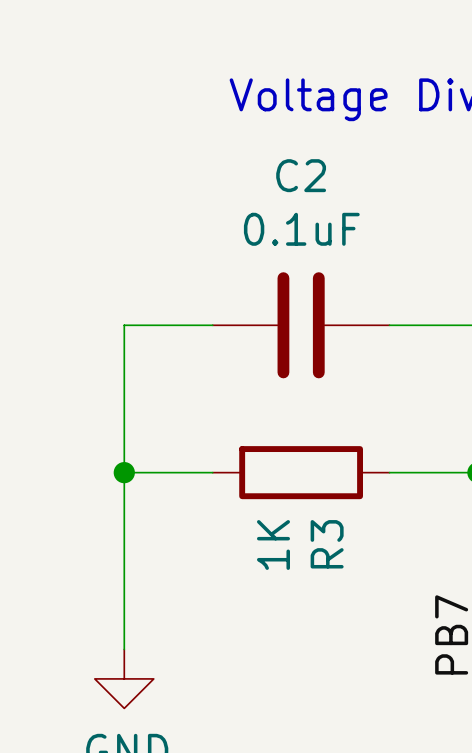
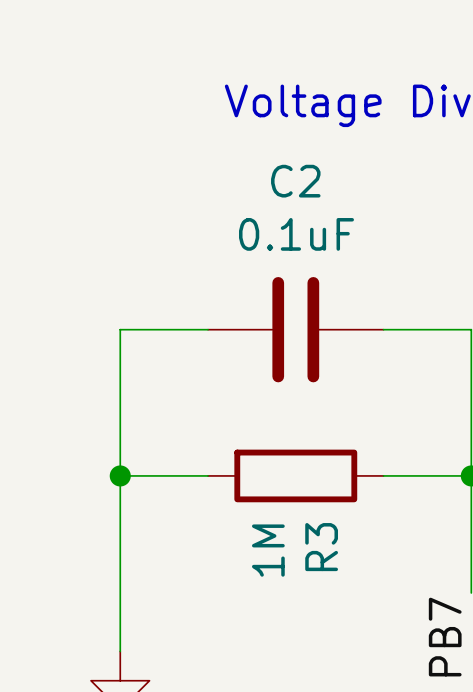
R3 value: 1K (273, 544) -> 1M (268, 550)

